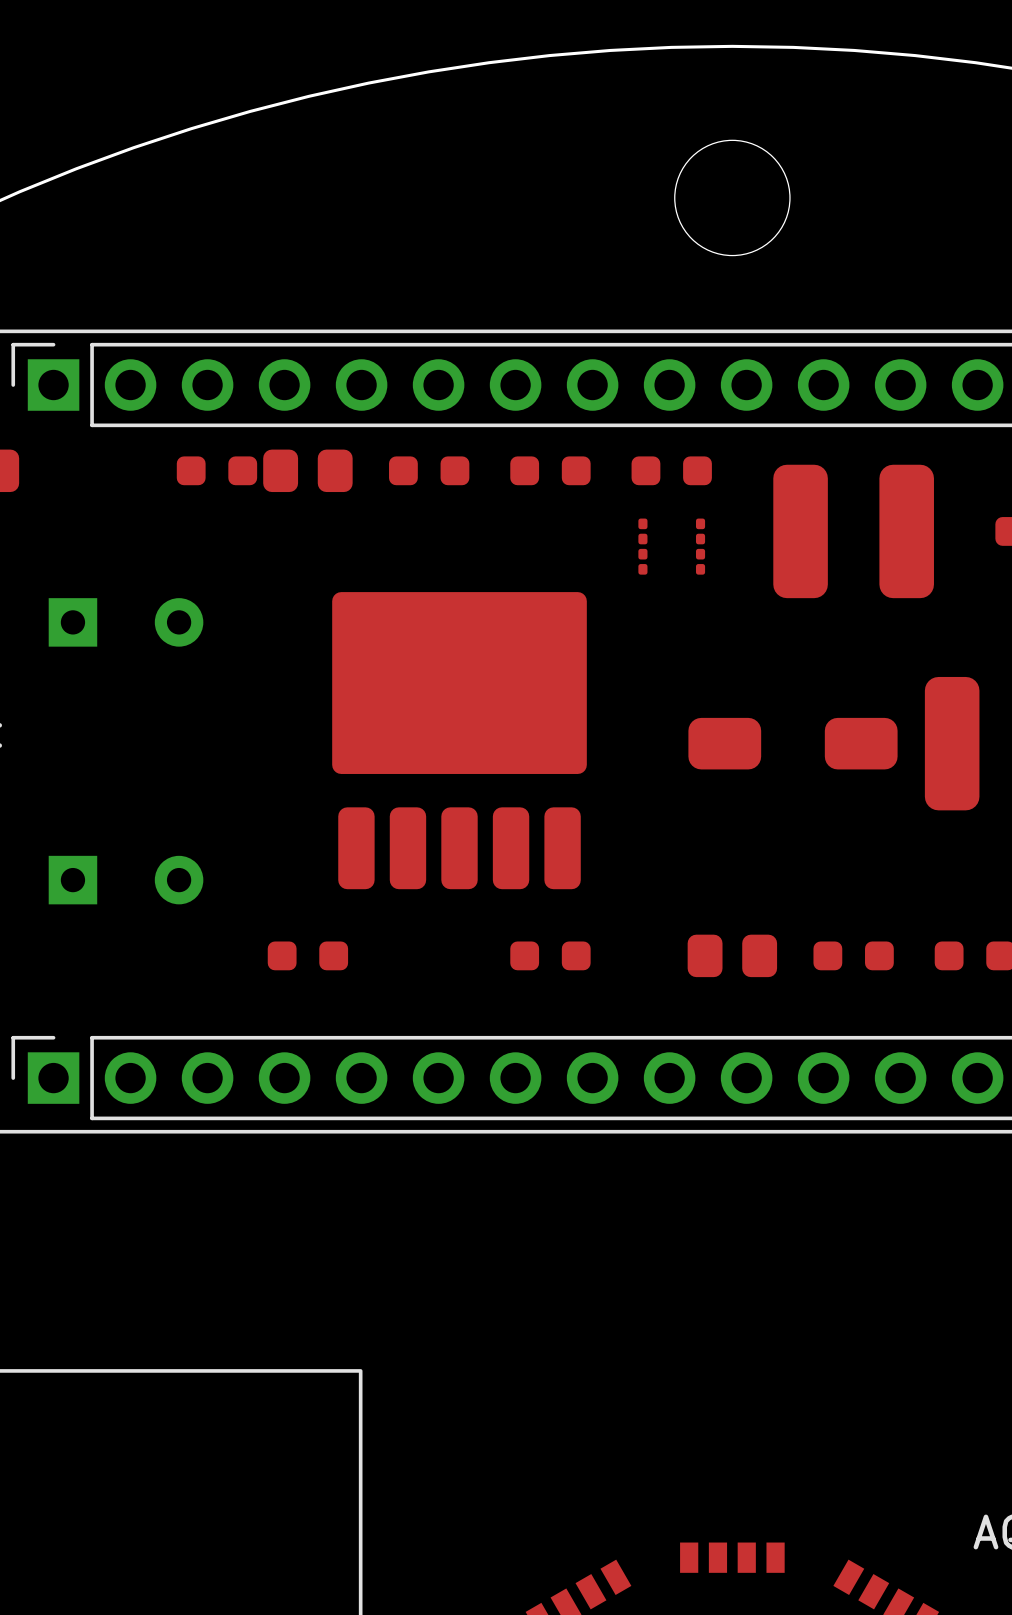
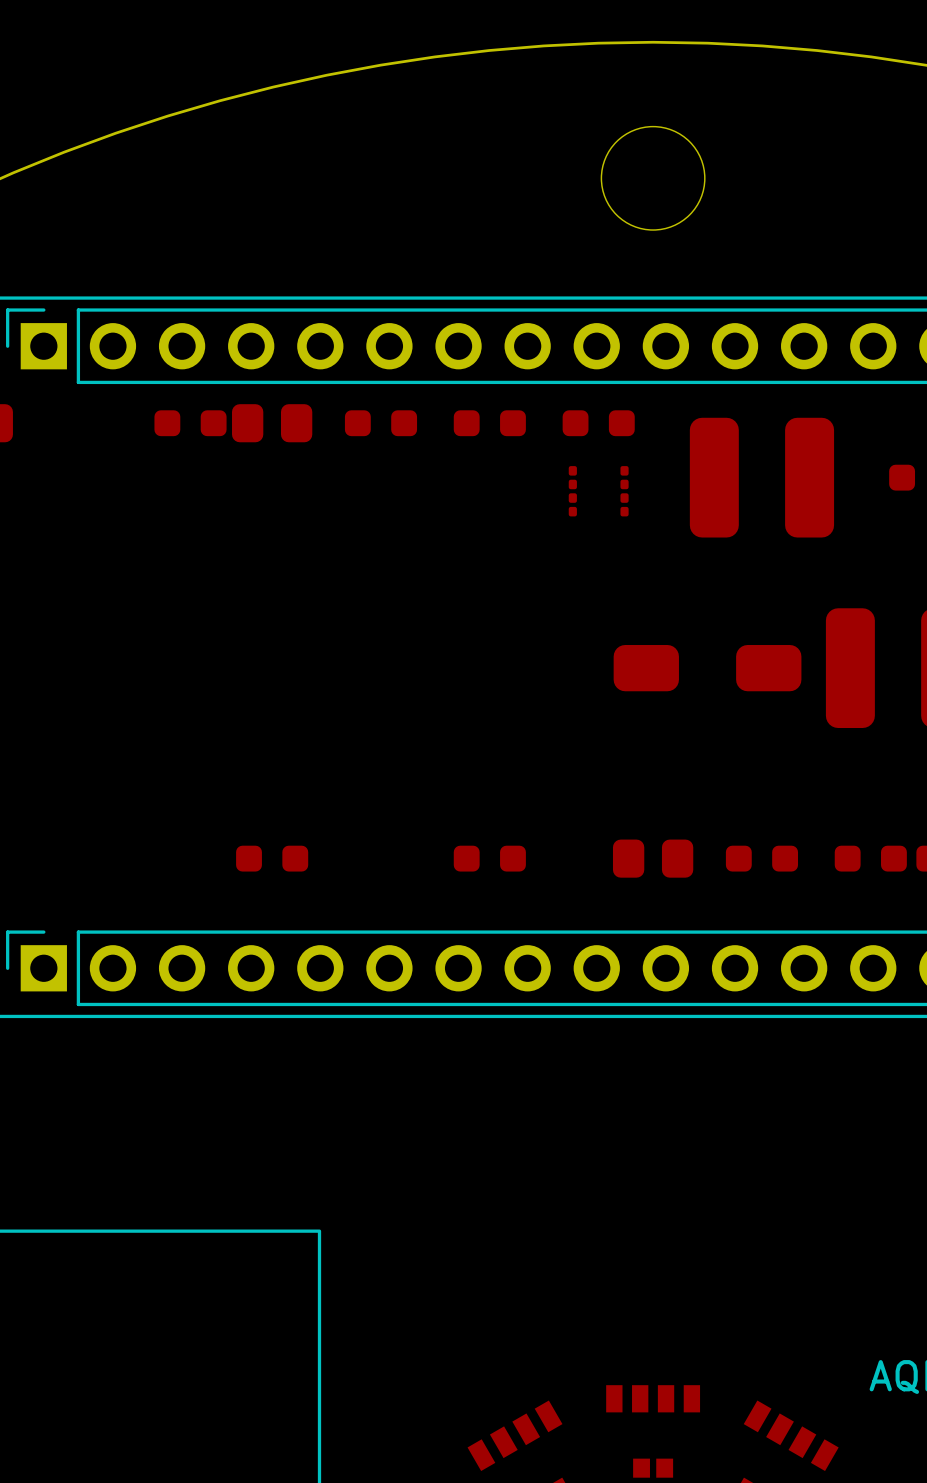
part: (126, 622) -> none
part: (459, 740) -> none
part: (126, 880) -> none

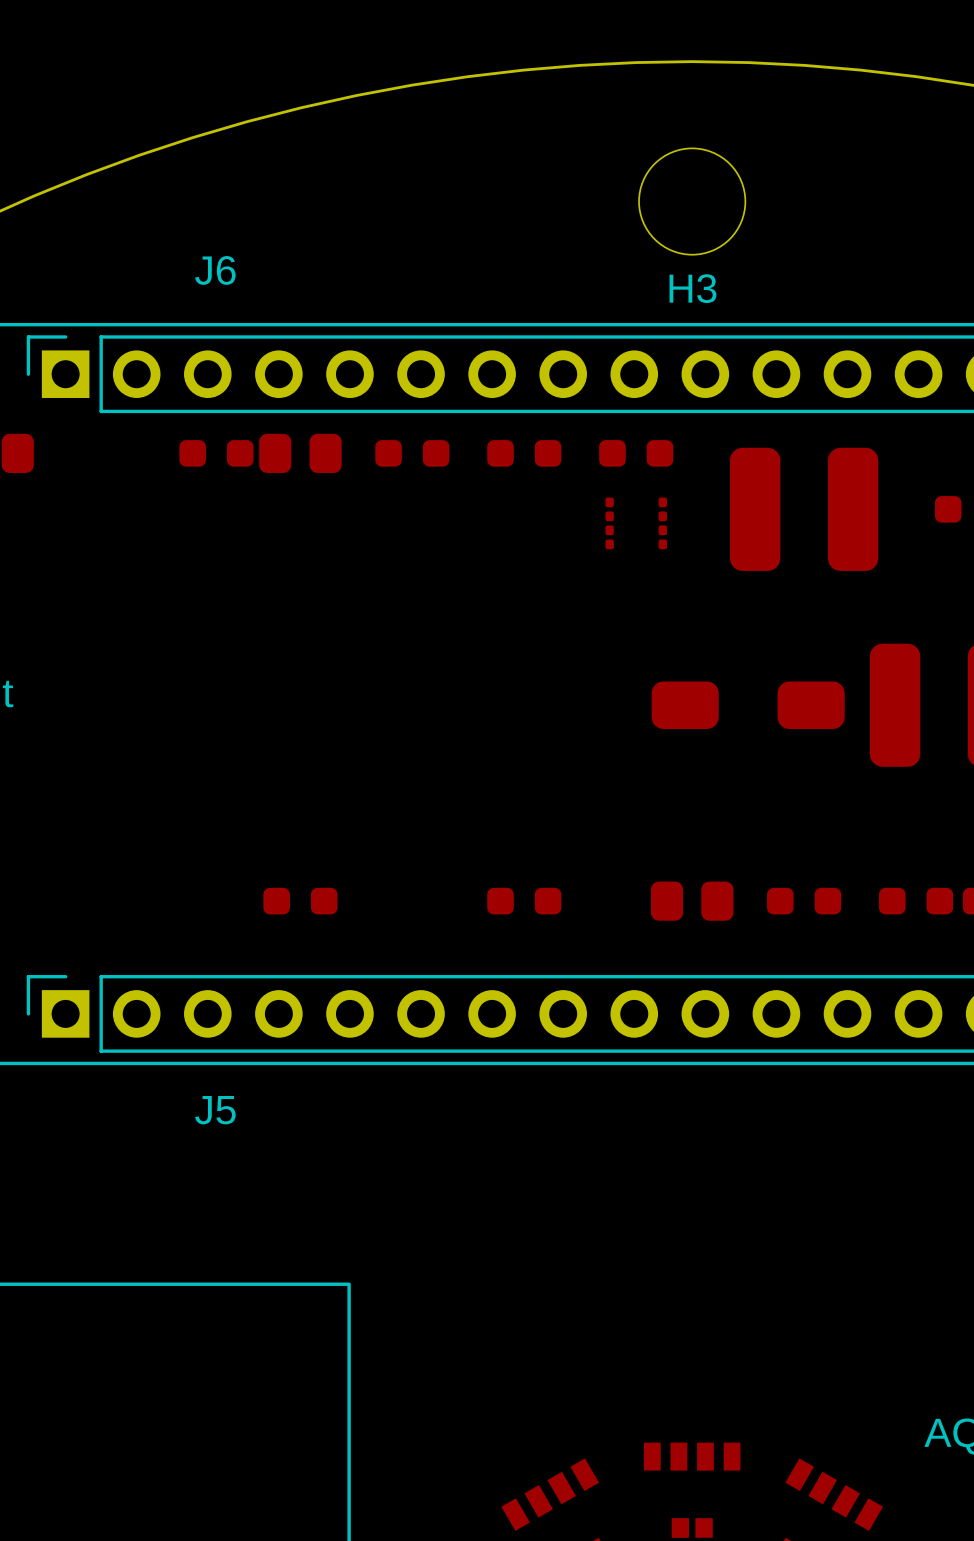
text: none -> J6 (215, 270)
text: none -> H3 (692, 288)
text: none -> J5 (215, 1110)

